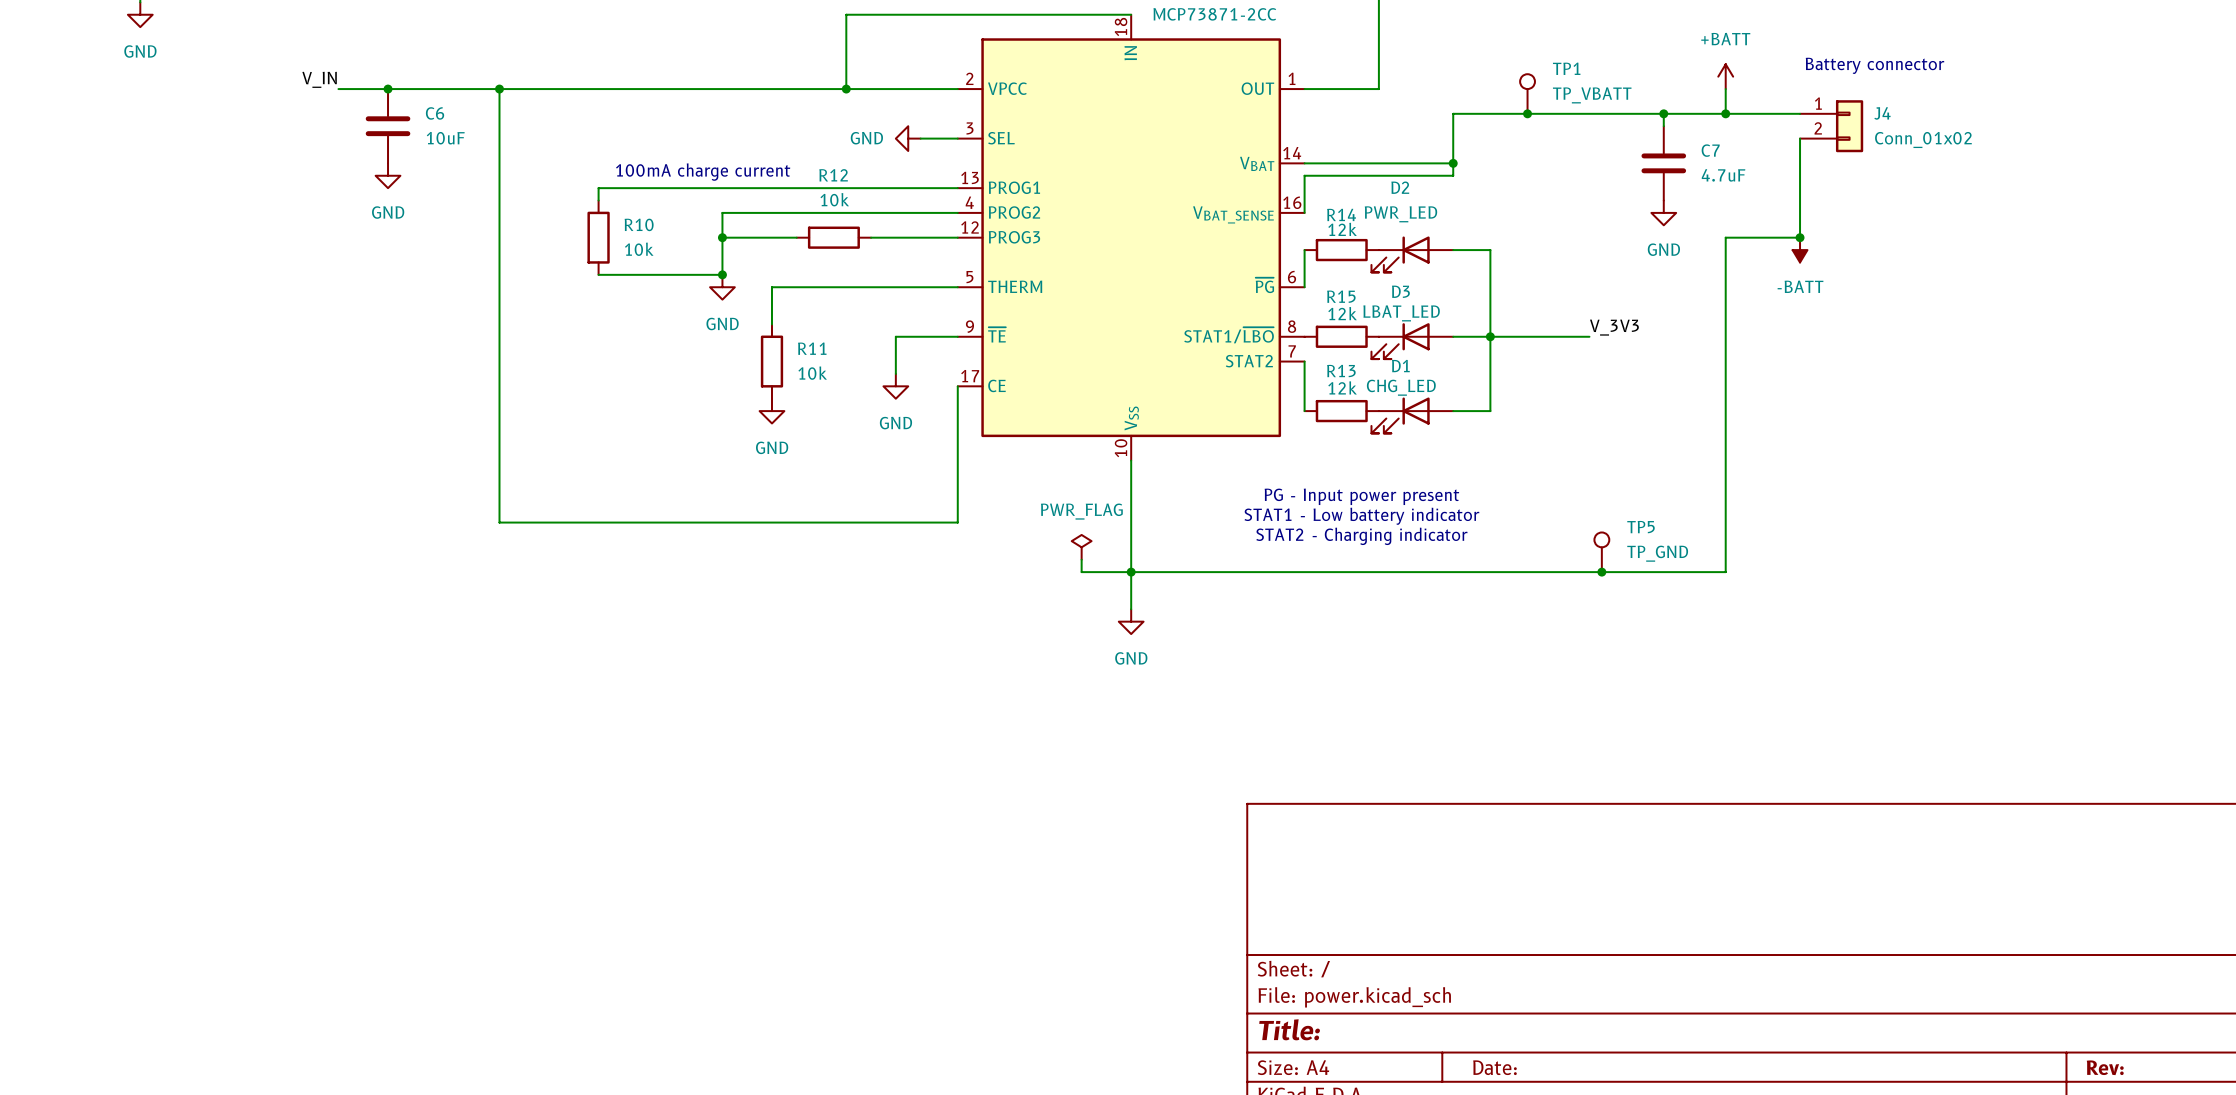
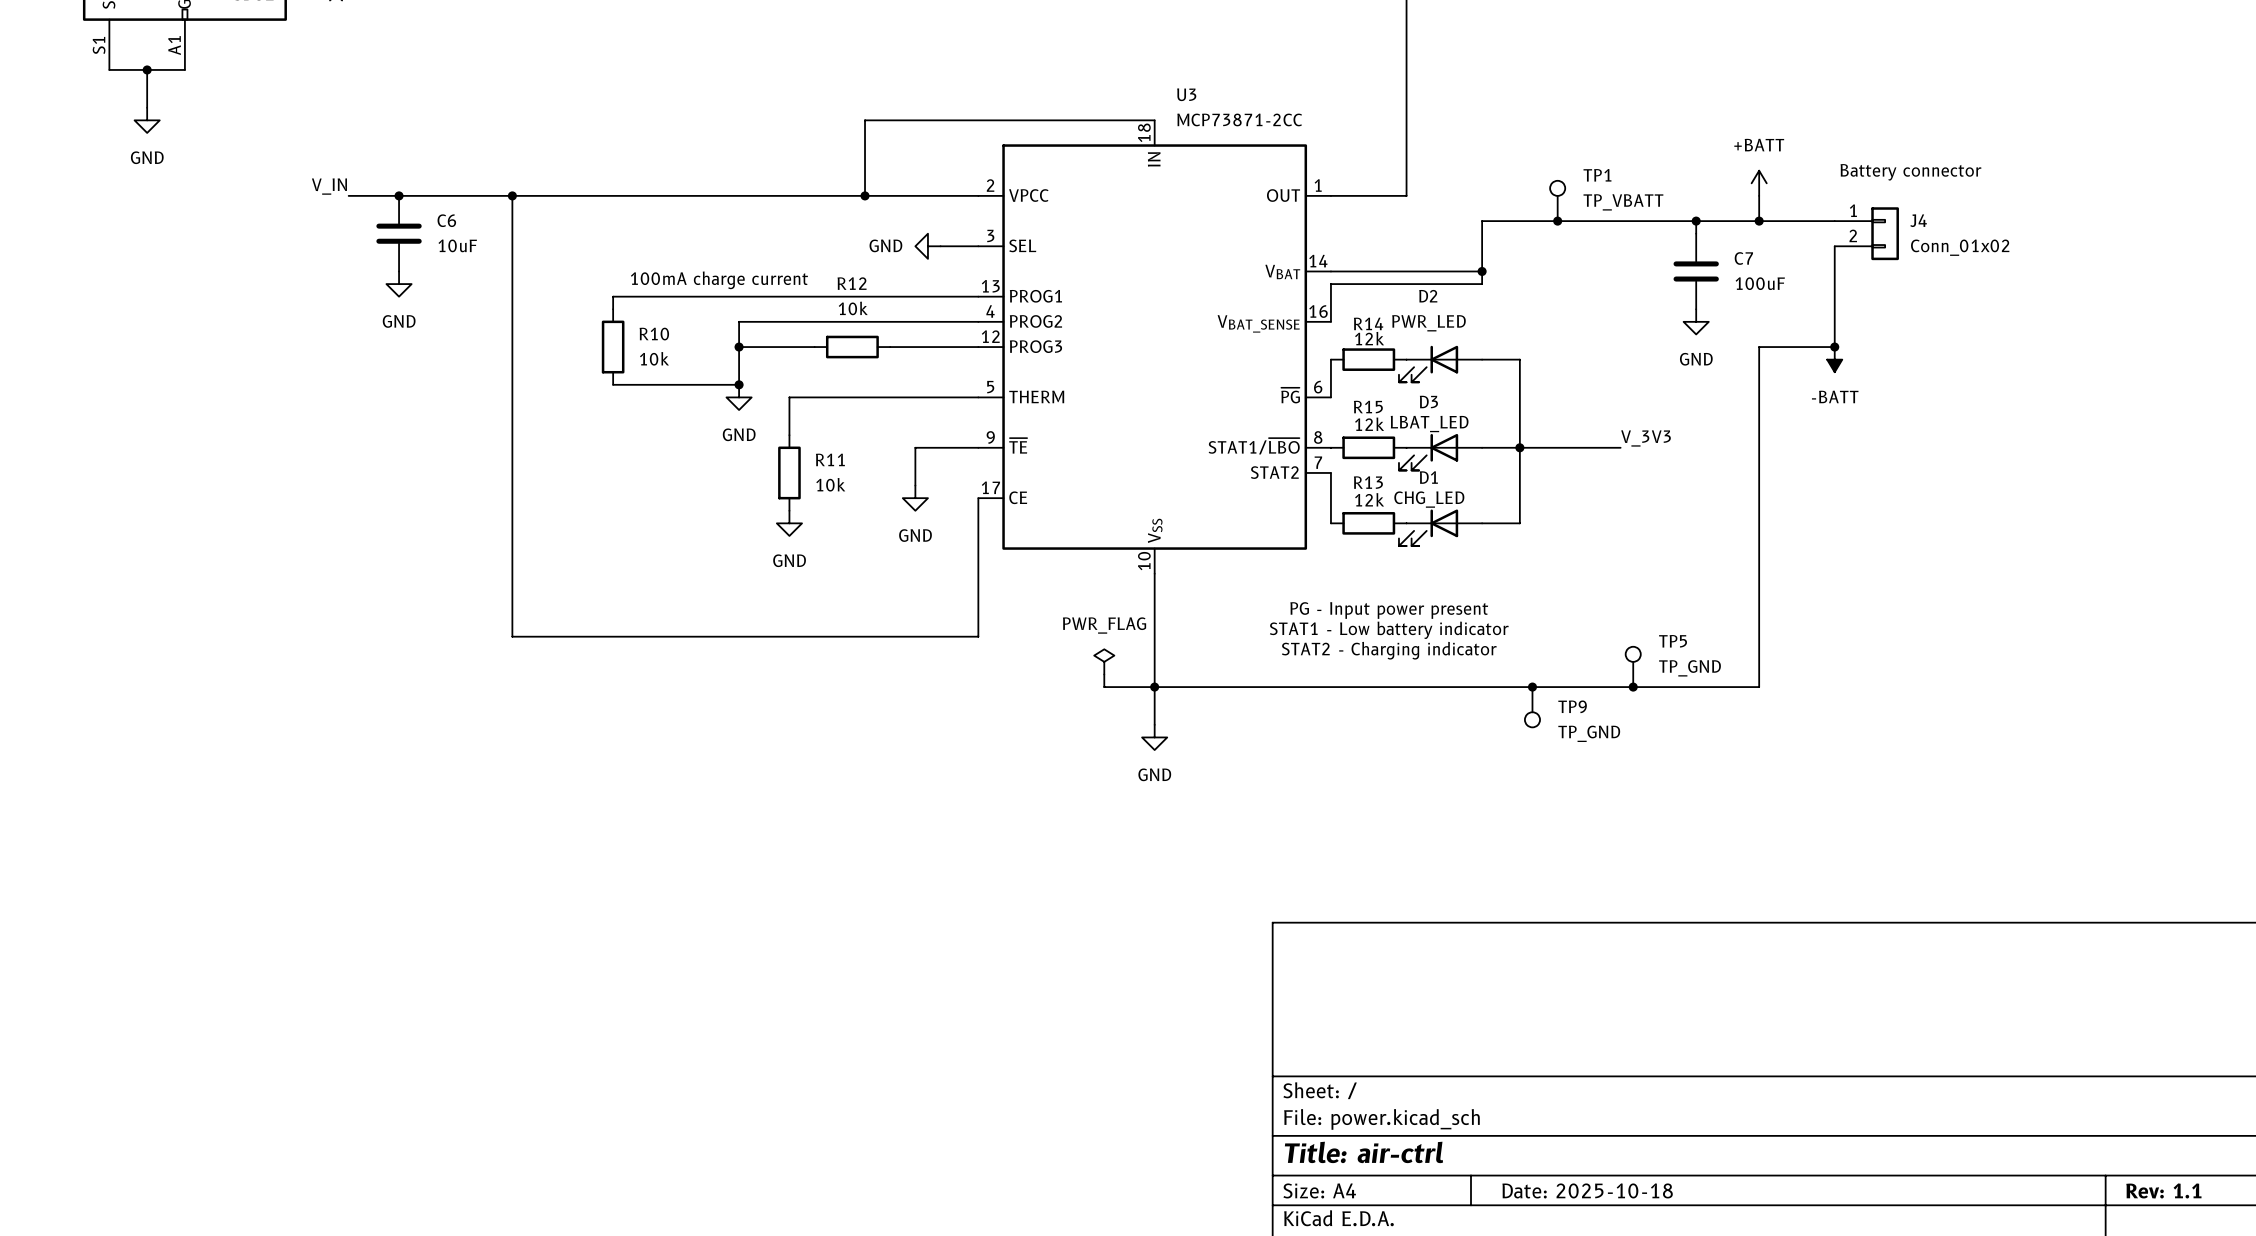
C7 value: 4.7uF (1723, 175) -> 100uF (1760, 283)
junction: none -> (1532, 687)
TP9: none -> TP_GND (1532, 707)
title block: Title: (1289, 1029) -> Title: air-ctrl (1363, 1152)
title block: Date: (1494, 1067) -> Date: 2025-10-18 (1587, 1190)
title block: Rev: (2105, 1067) -> Rev: 1.1 (2163, 1190)

